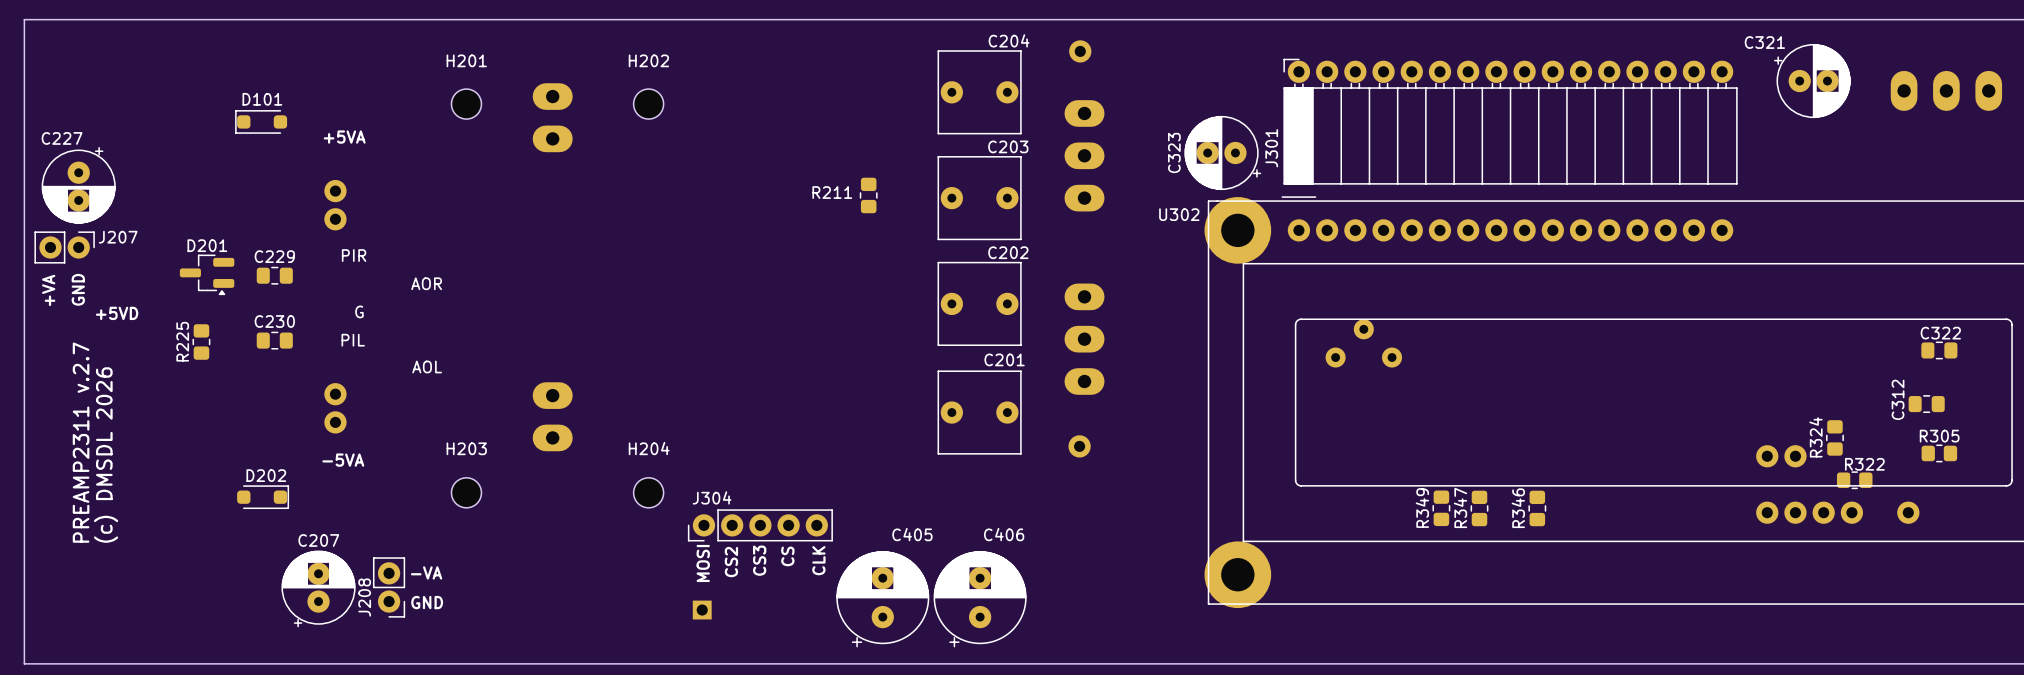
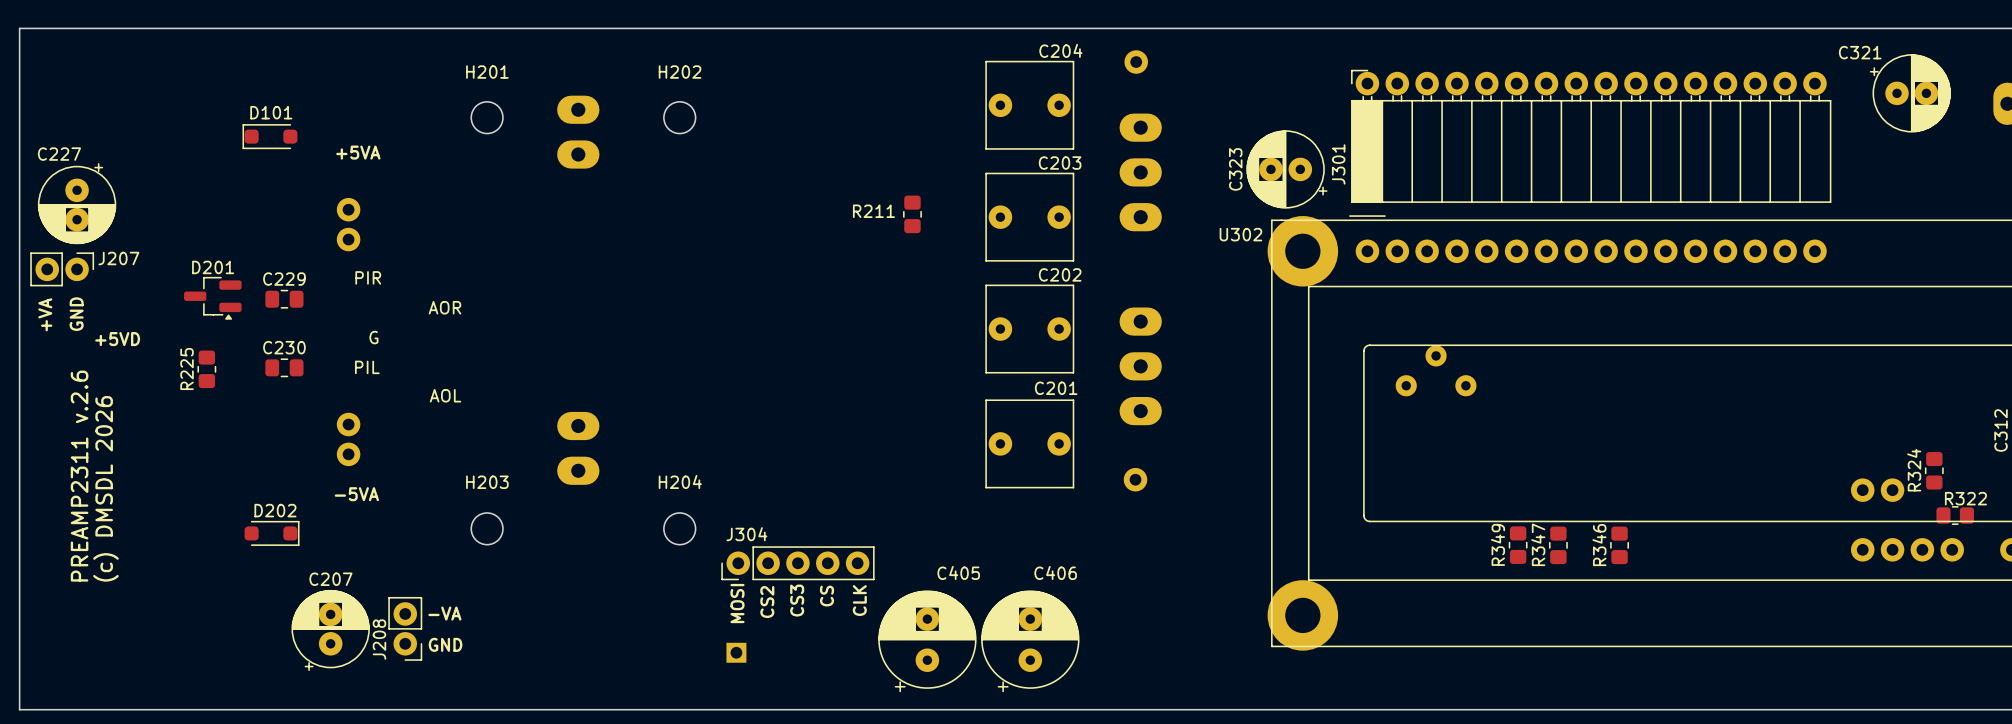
text: PREAMP2311 v.2.7 (81, 442) -> PREAMP2311 v.2.6 (79, 476)

